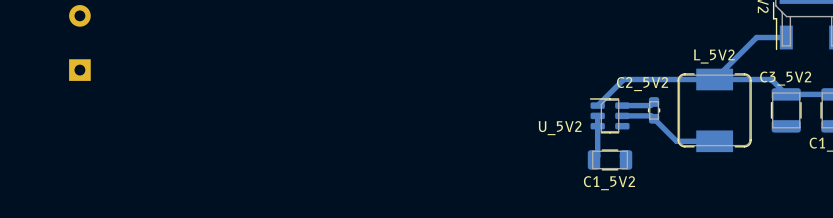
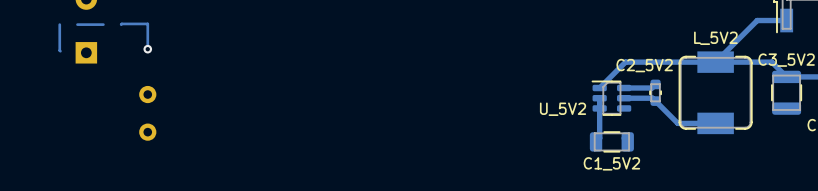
track: none -> (59, 24) (60, 51)
track: none -> (103, 24) (77, 24)
track: none -> (121, 24) (147, 23) (147, 49)
via: none -> (147, 49)
part: none -> (147, 113)

